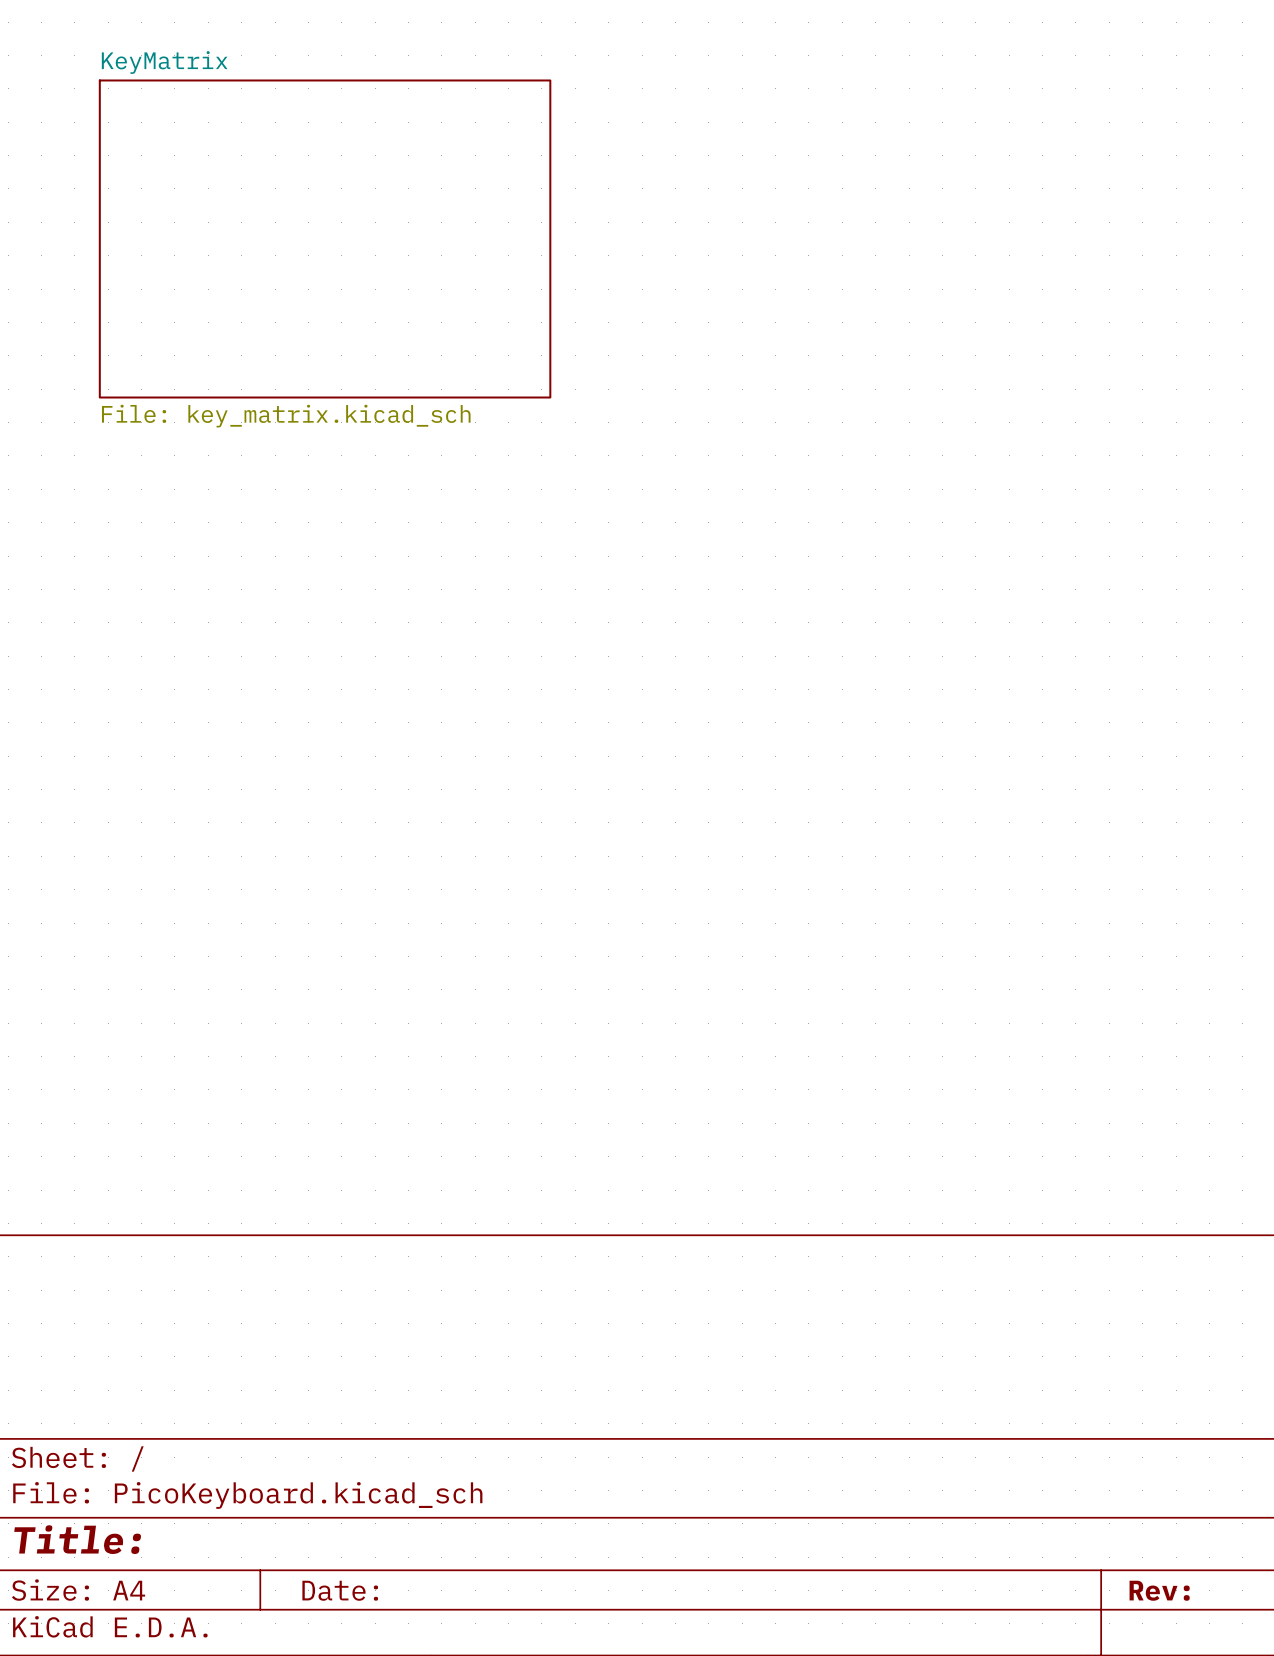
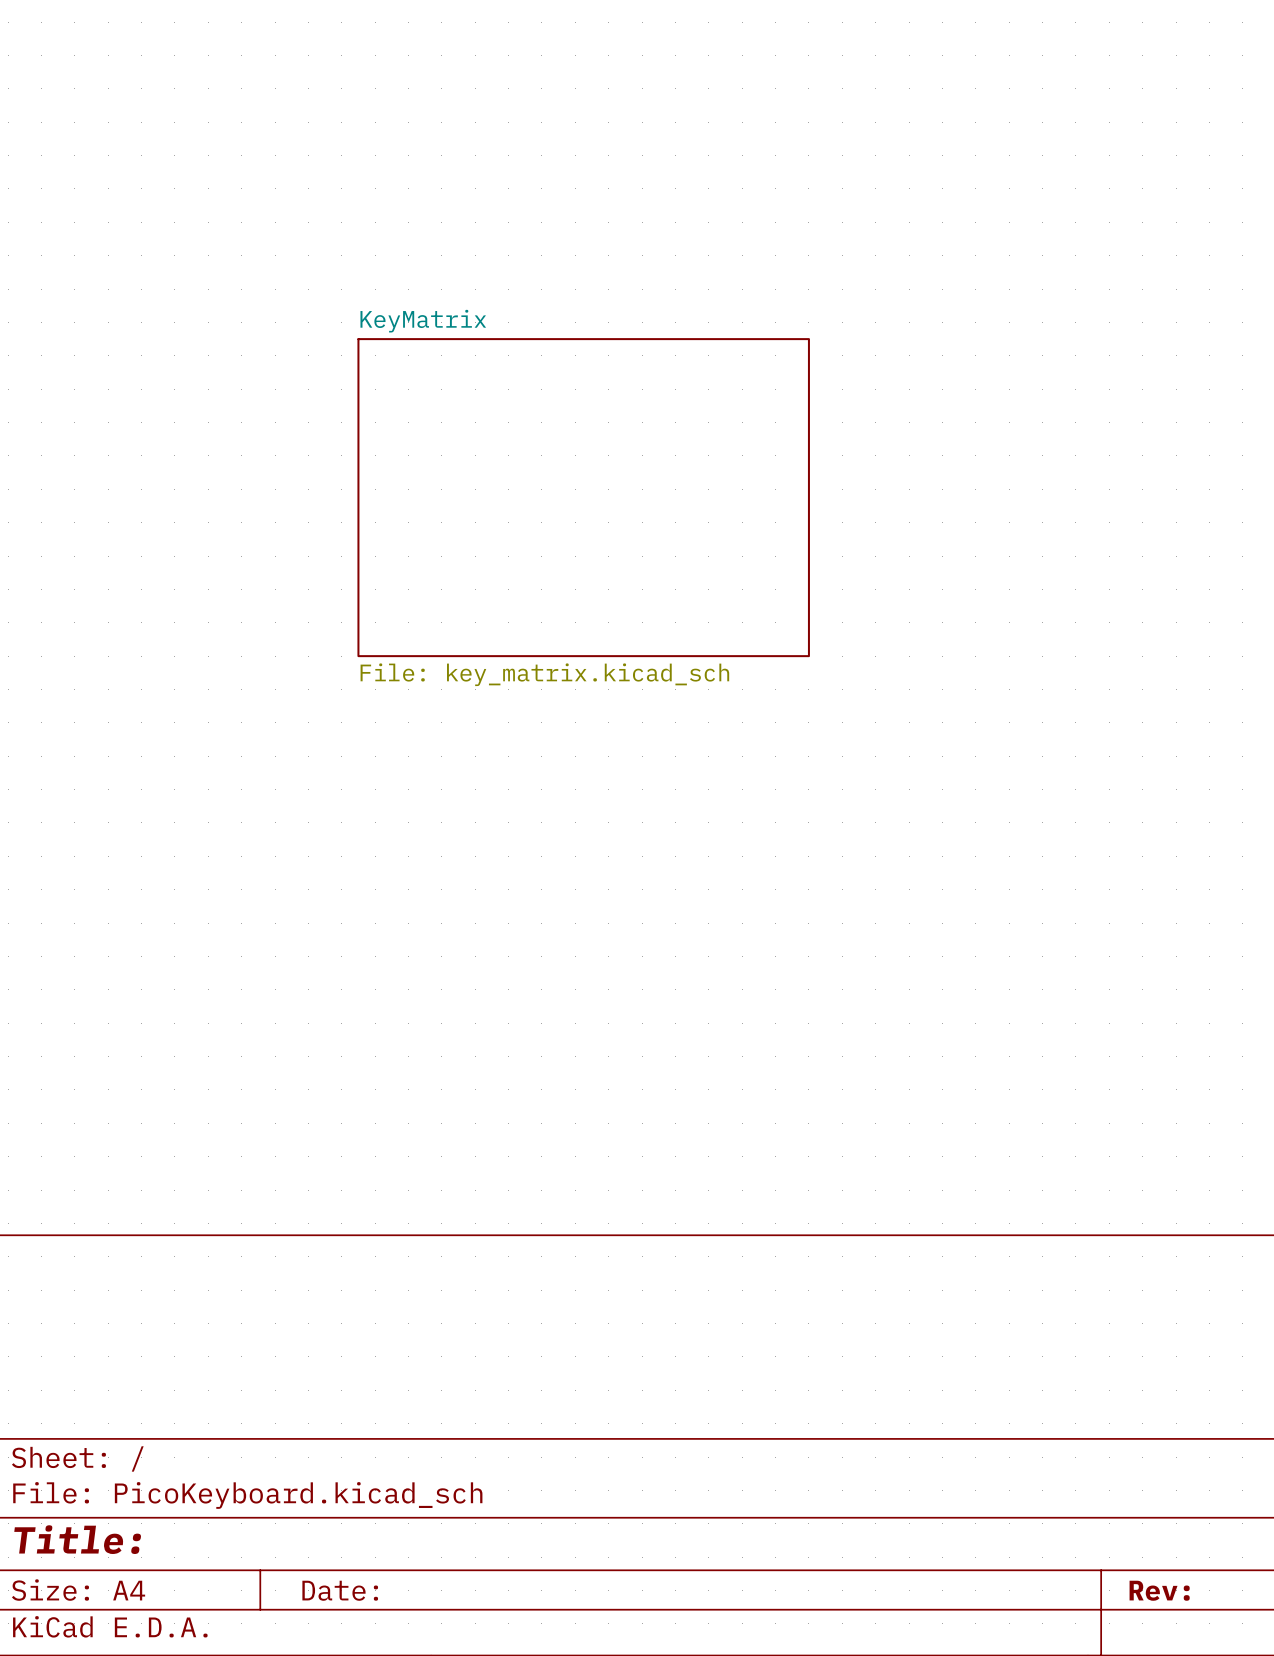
sheet KeyMatrix: File: key_matrix.kicad_sch (325, 238) -> none
sheet KeyMatrix: none -> File: key_matrix.kicad_sch (583, 497)

